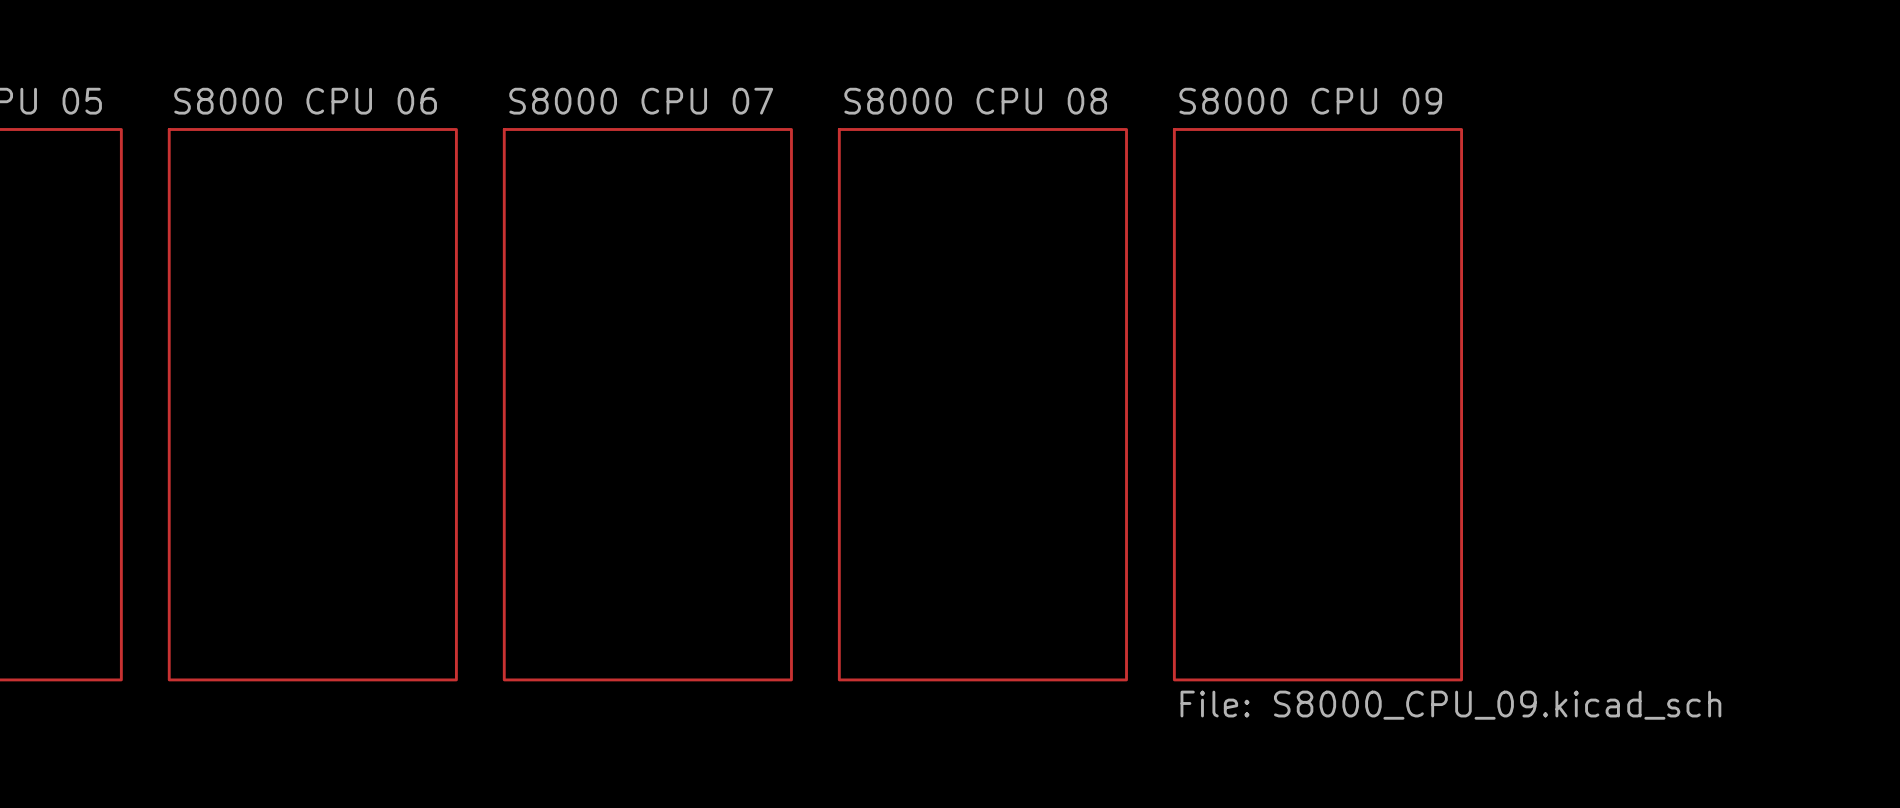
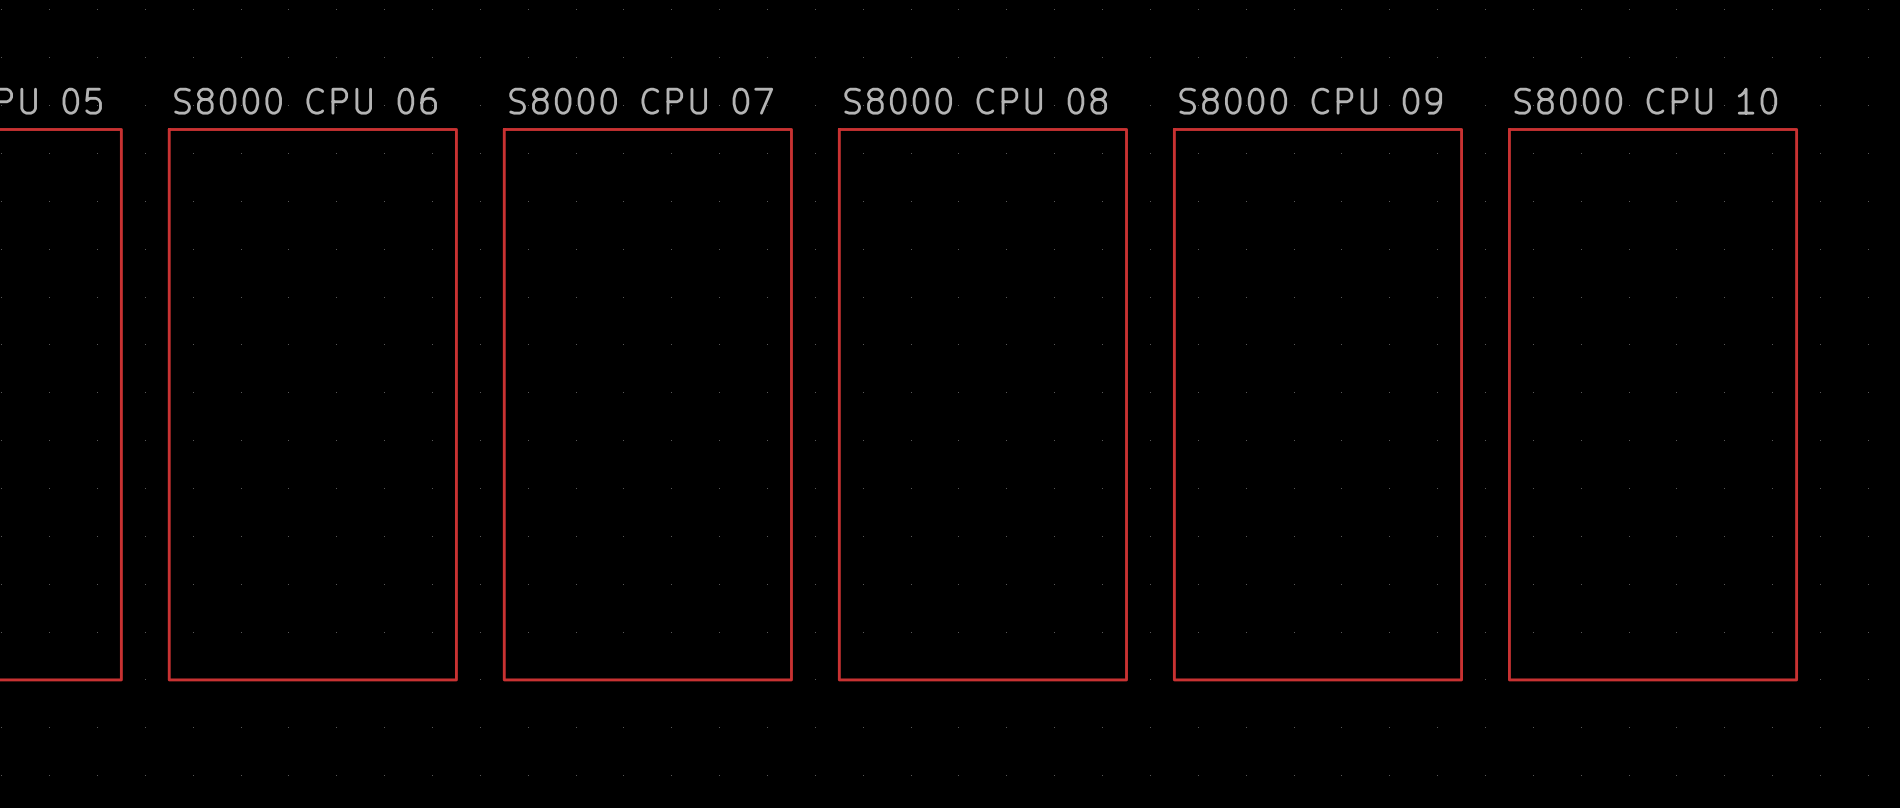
sheet S8000 CPU 10: none -> (1653, 404)
sheet S8000 CPU 09 value: File: S8000_CPU_09.kicad_sch (1450, 705) -> none

